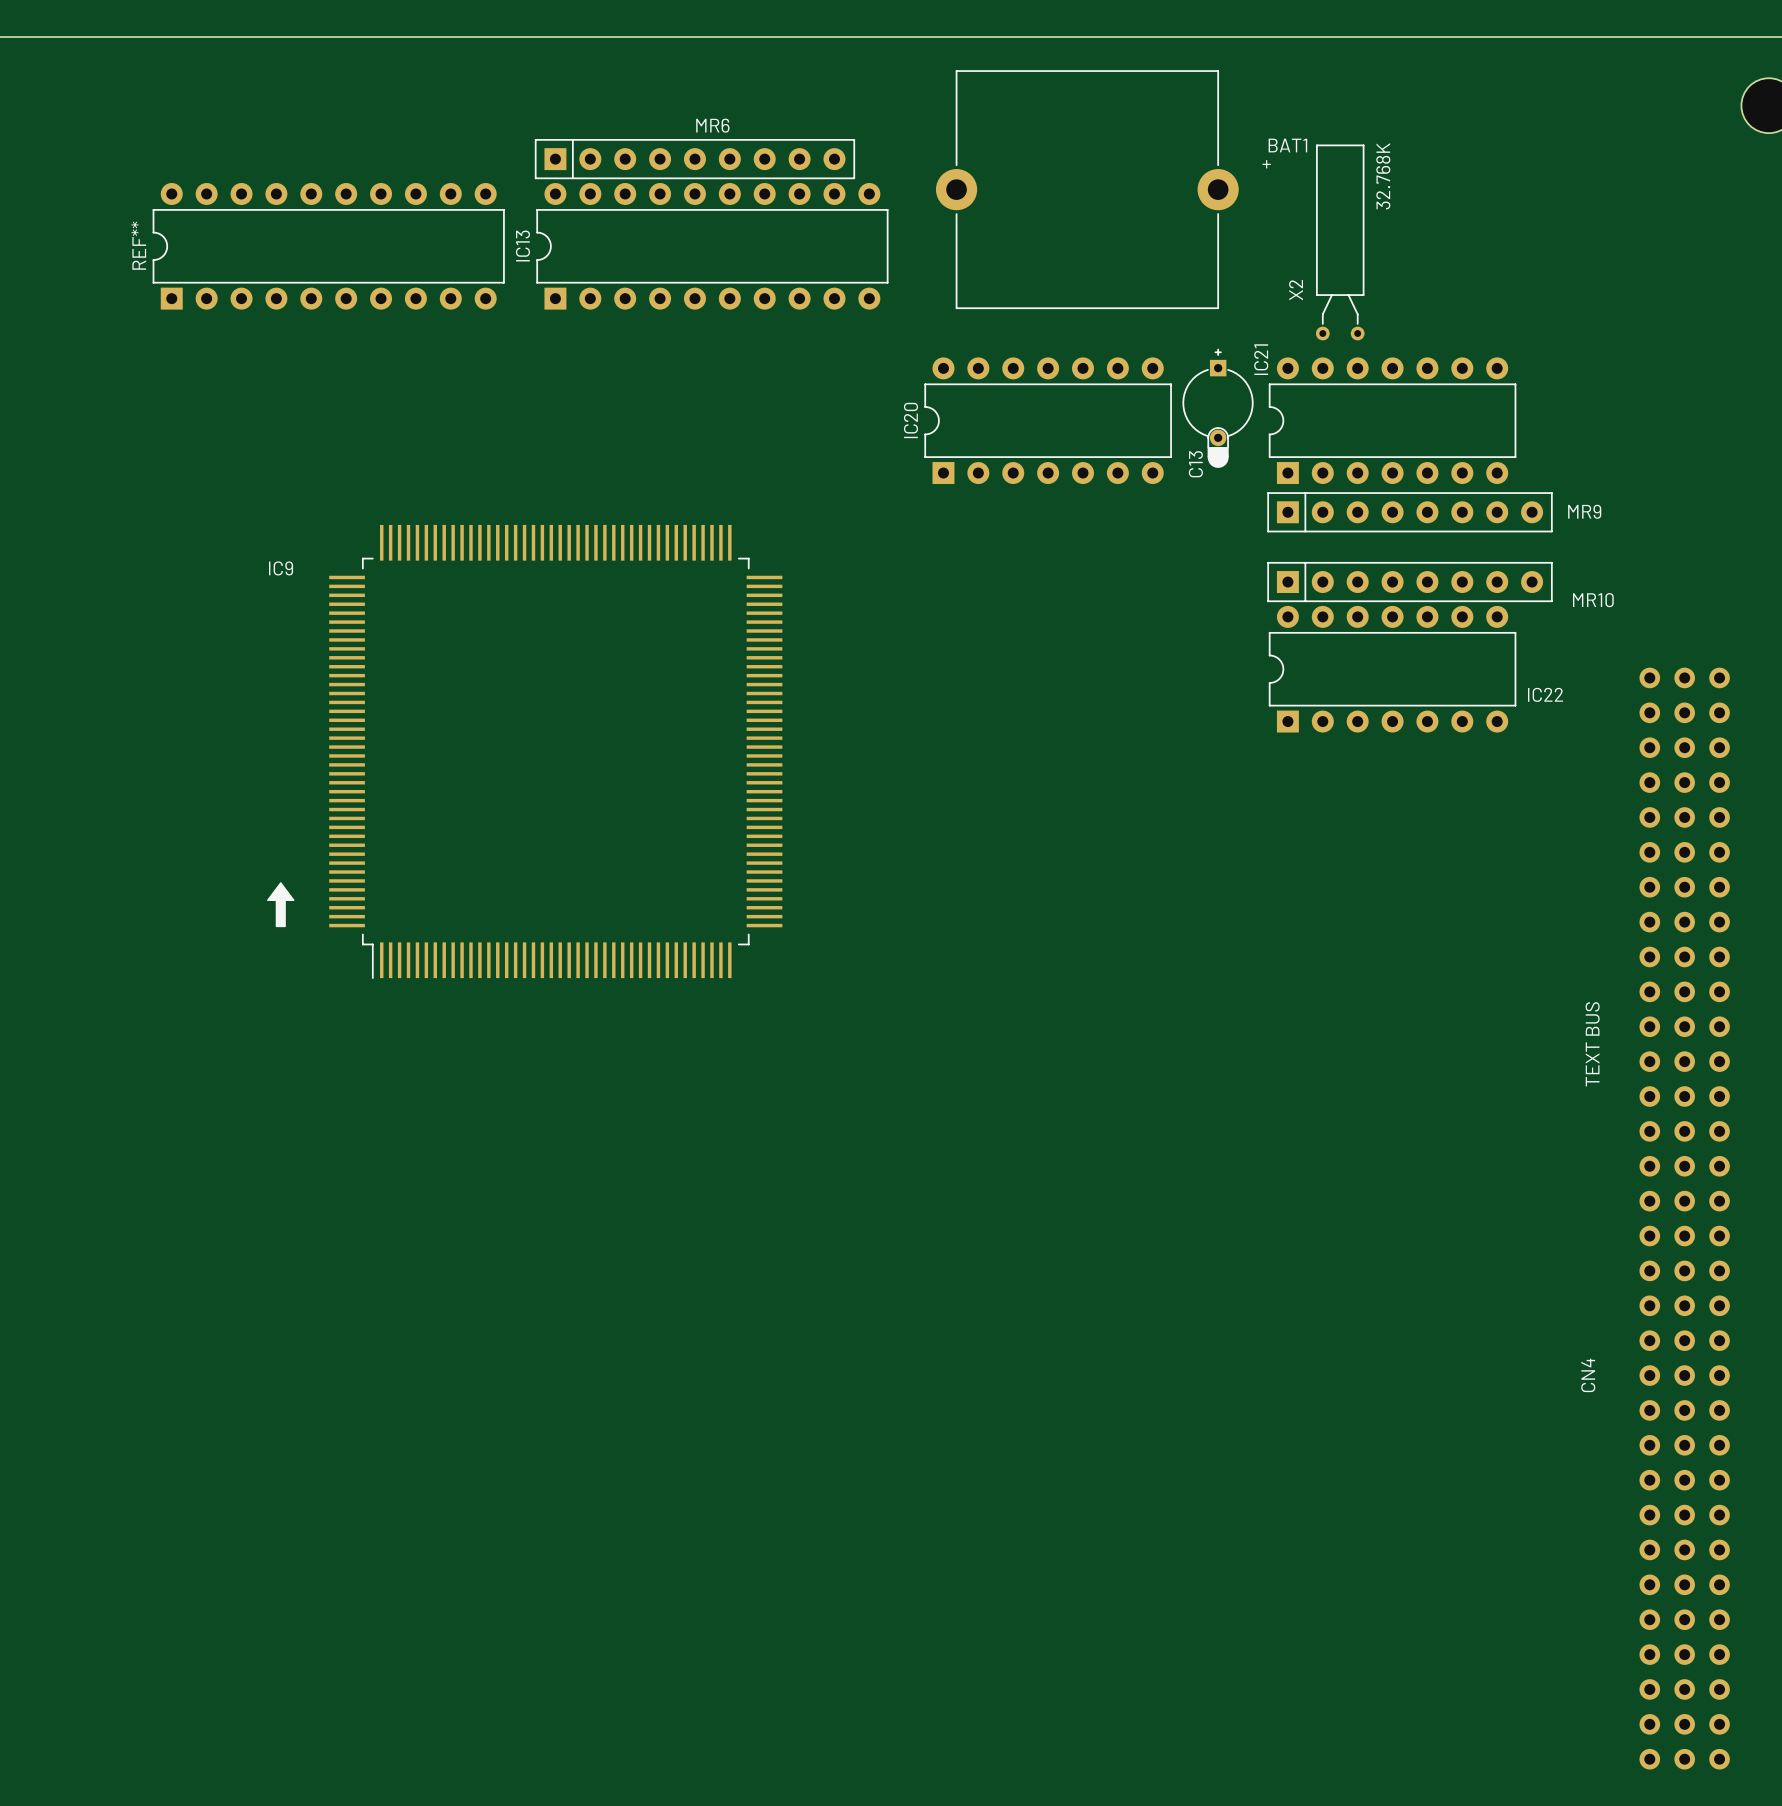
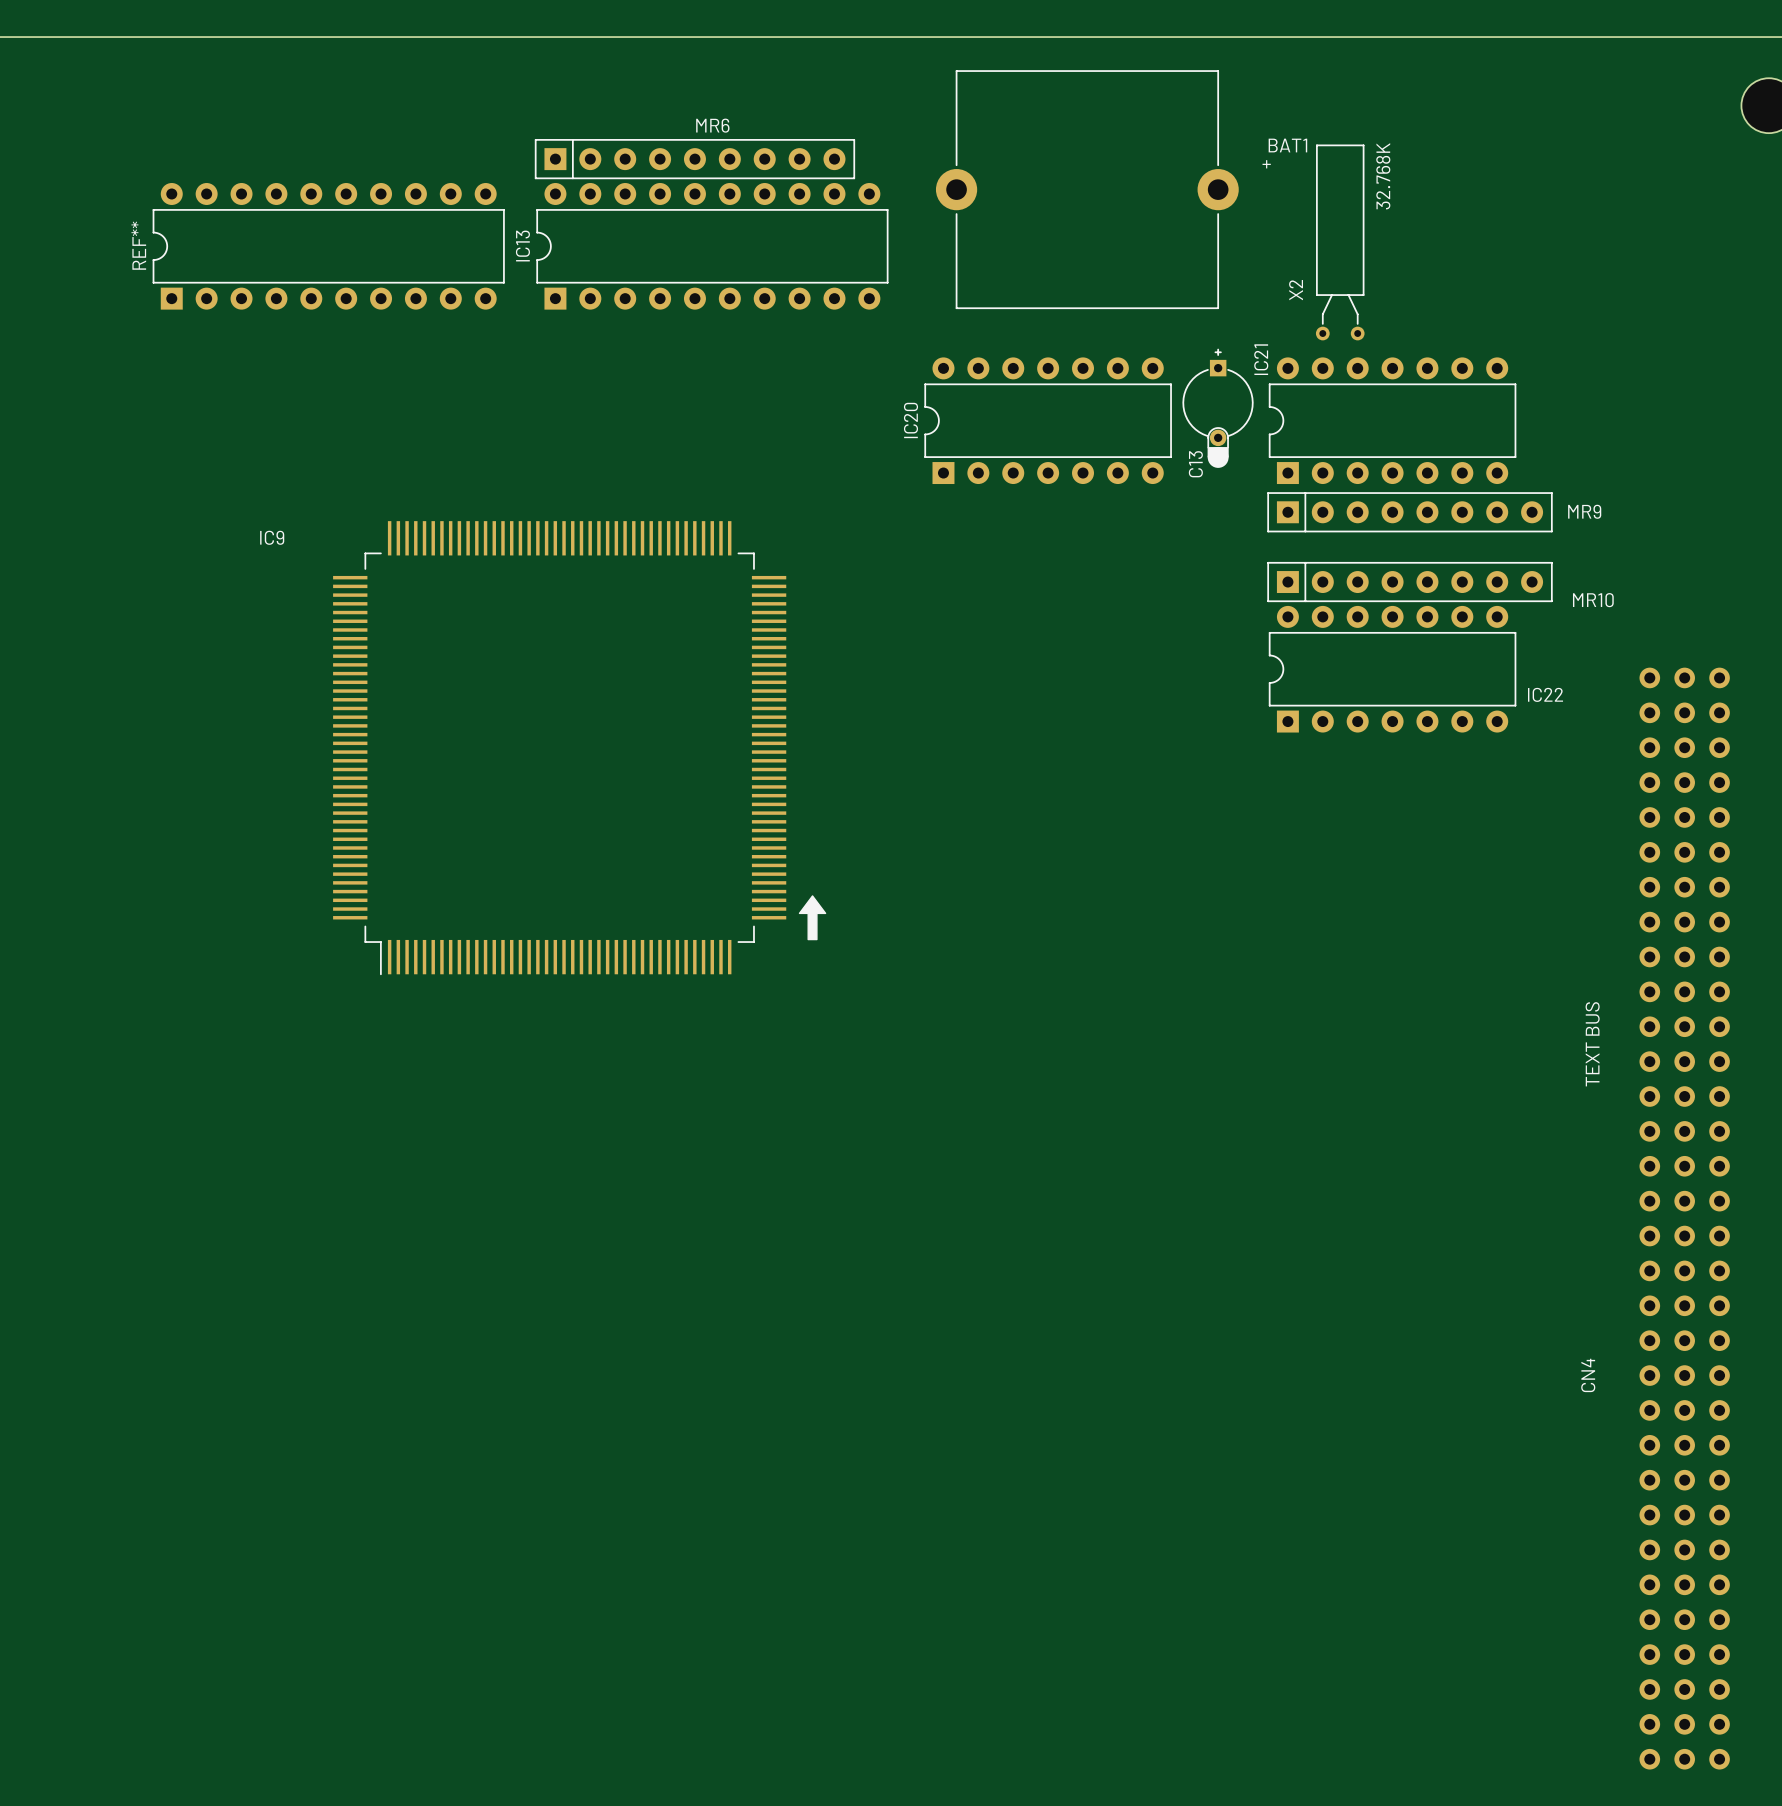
IC9 footprint: [329, 524, 783, 979] -> [333, 521, 827, 976]
IC9 name position: IC9 (281, 568) -> IC9 (272, 537)
drawing: [267, 882, 295, 928] -> none

